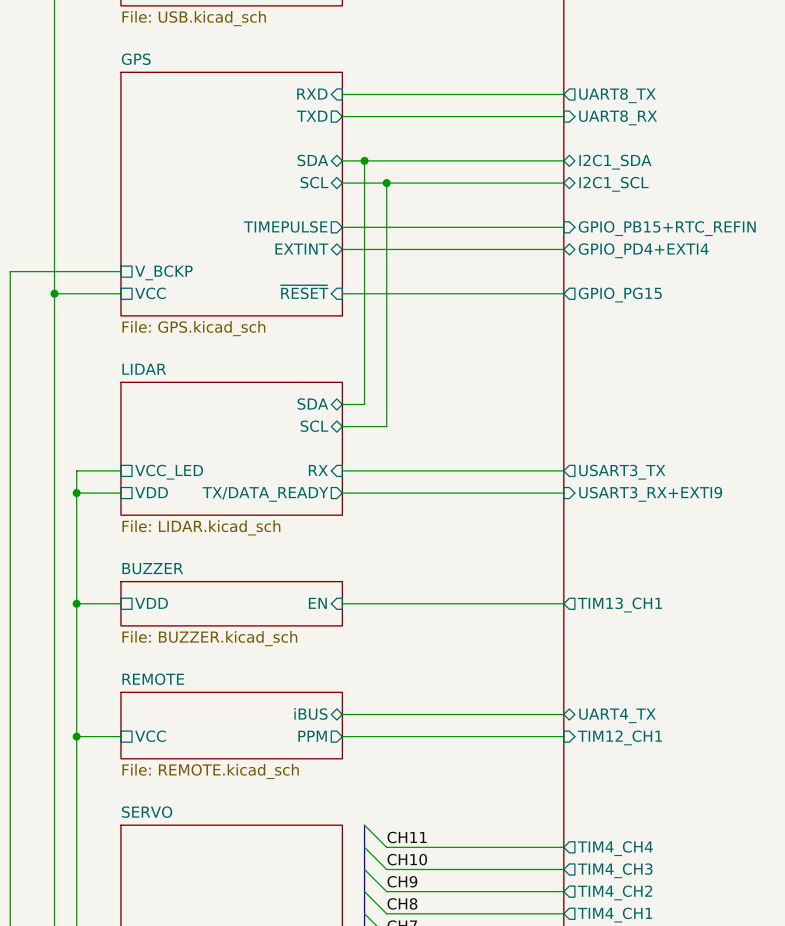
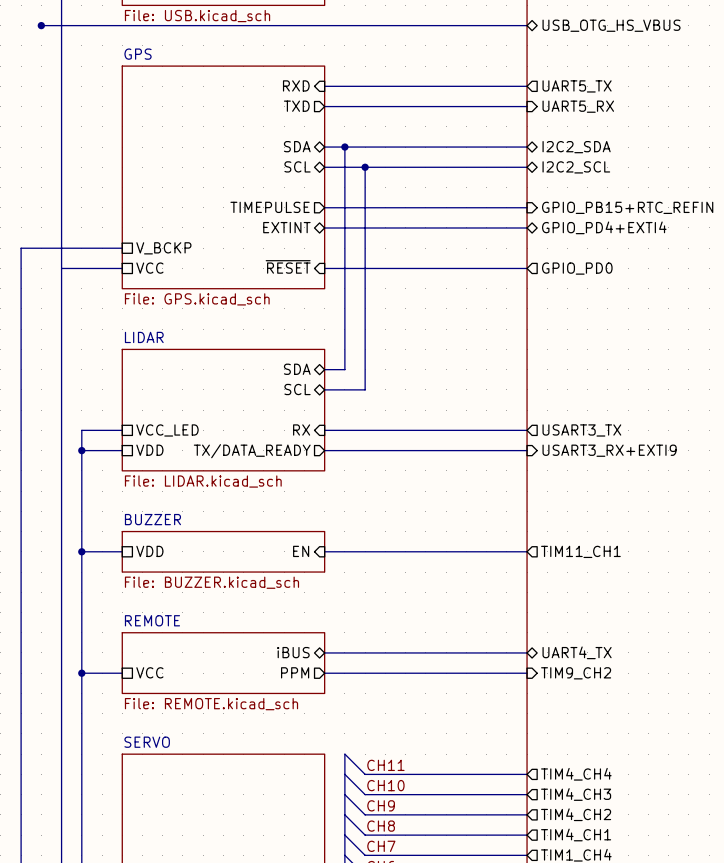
wire: none -> (41, 25) (527, 25)
junction: none -> (41, 25)
sheet pin: none -> USB_OTG_HS_VBUS (611, 25)
sheet pin: UART8_TX (617, 95) -> UART5_TX (577, 86)
sheet pin: UART8_RX (618, 117) -> UART5_RX (578, 106)
sheet pin: I2C1_SDA (615, 162) -> I2C2_SDA (576, 147)
sheet pin: I2C1_SCL (613, 184) -> I2C2_SCL (576, 167)
junction: (54, 293) -> none
sheet pin: GPIO_PG15 (620, 295) -> GPIO_PD0 (577, 268)
sheet pin: TIM13_CH1 (619, 605) -> TIM11_CH1 (580, 551)
sheet pin: TIM12_CH1 (619, 737) -> TIM9_CH2 (576, 673)

